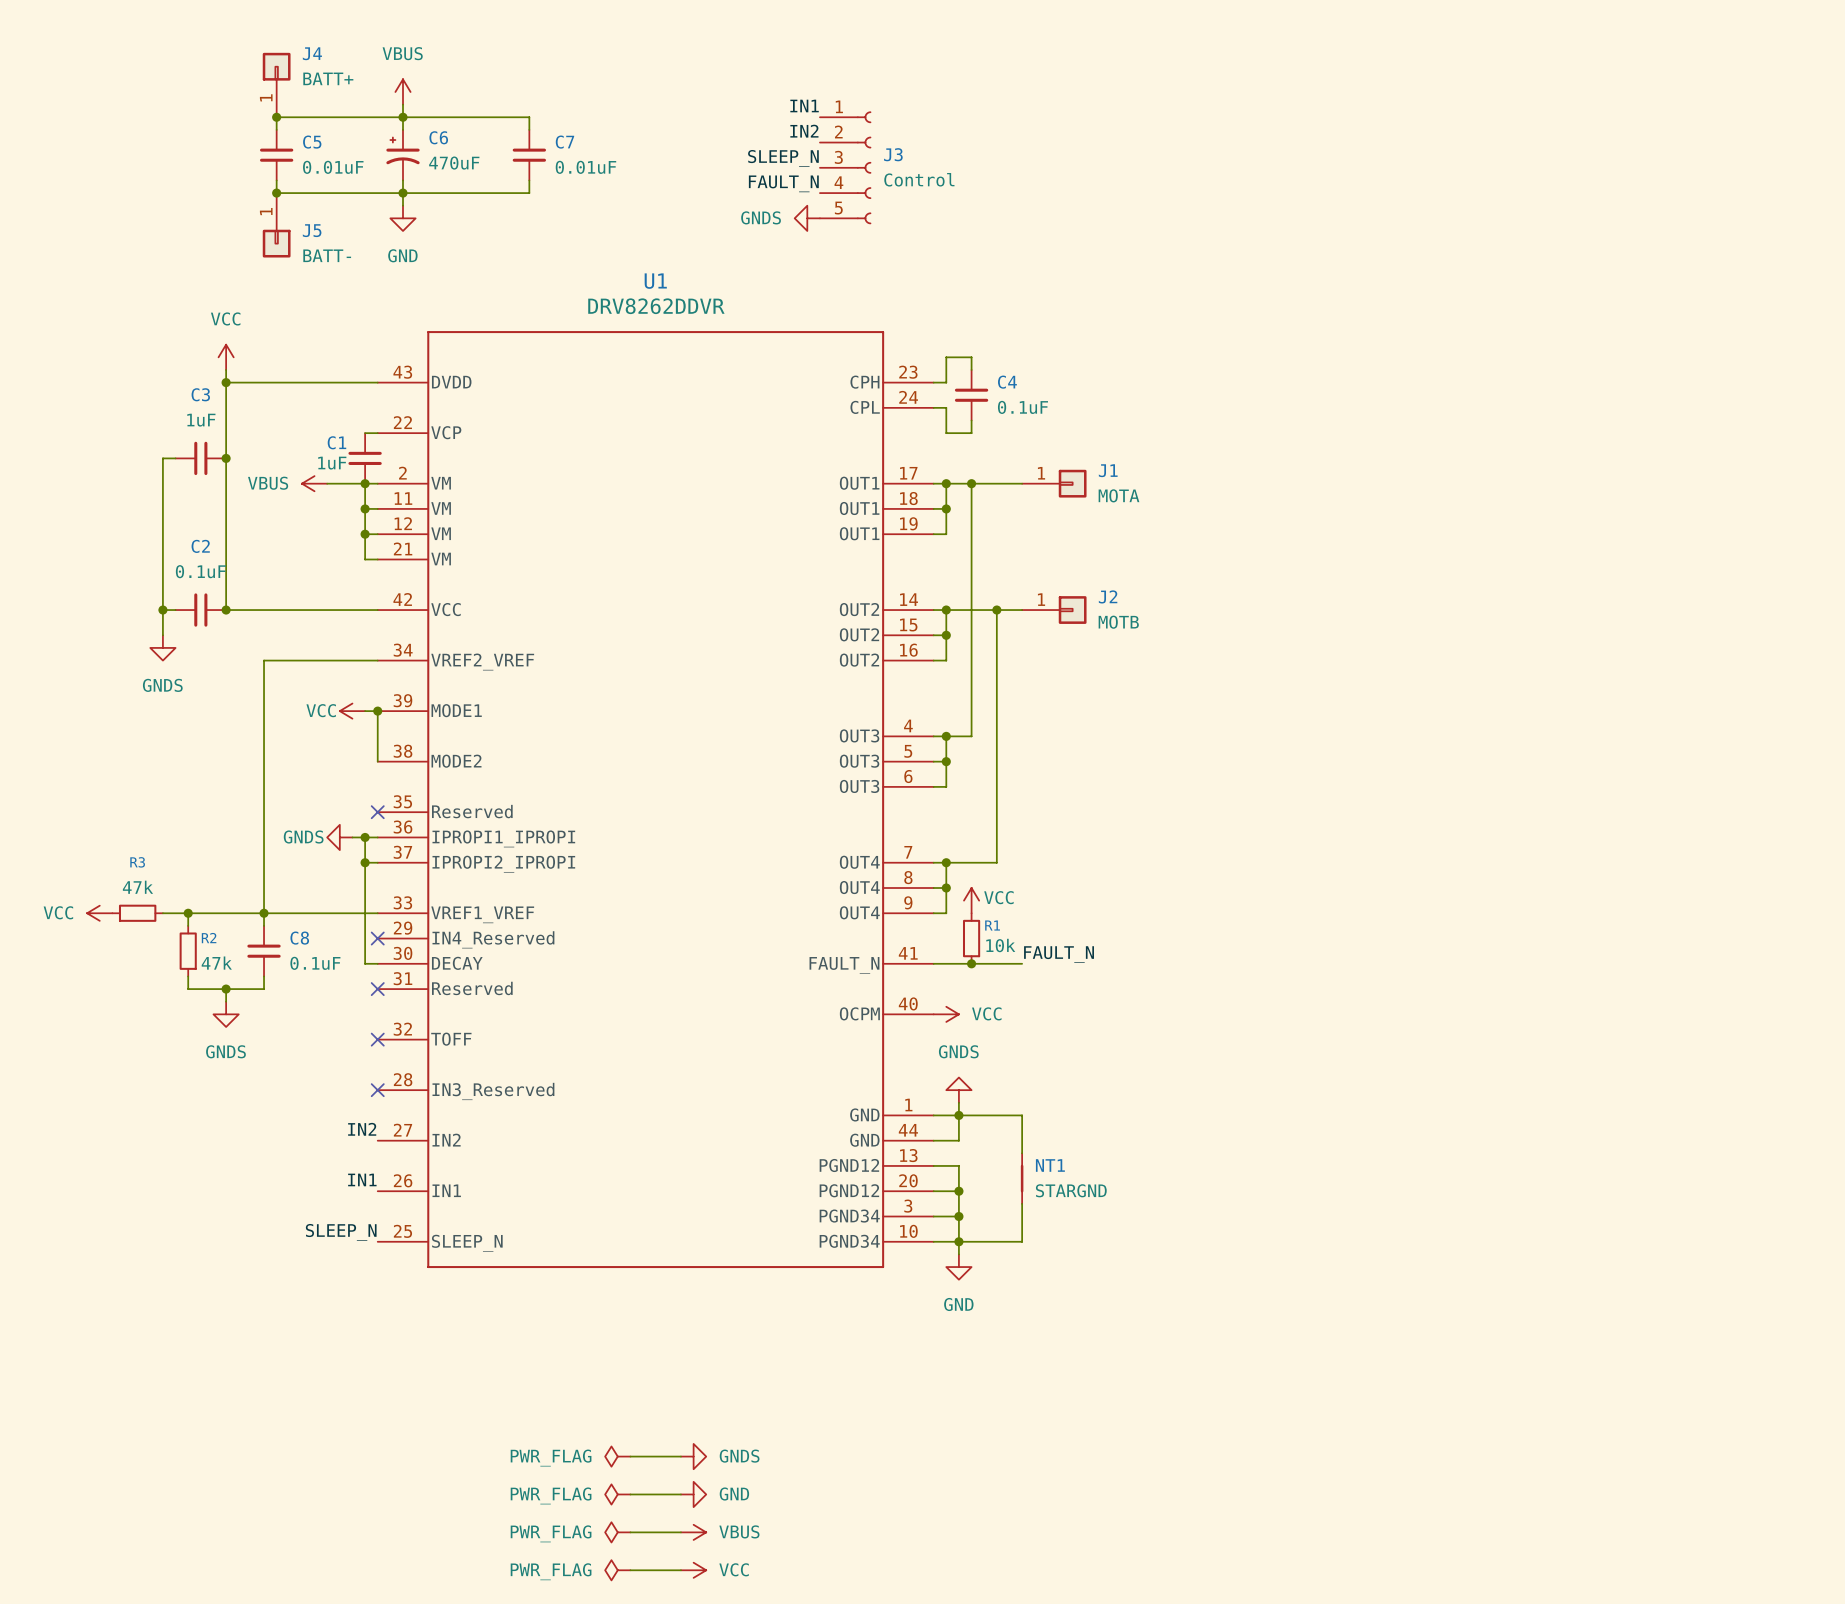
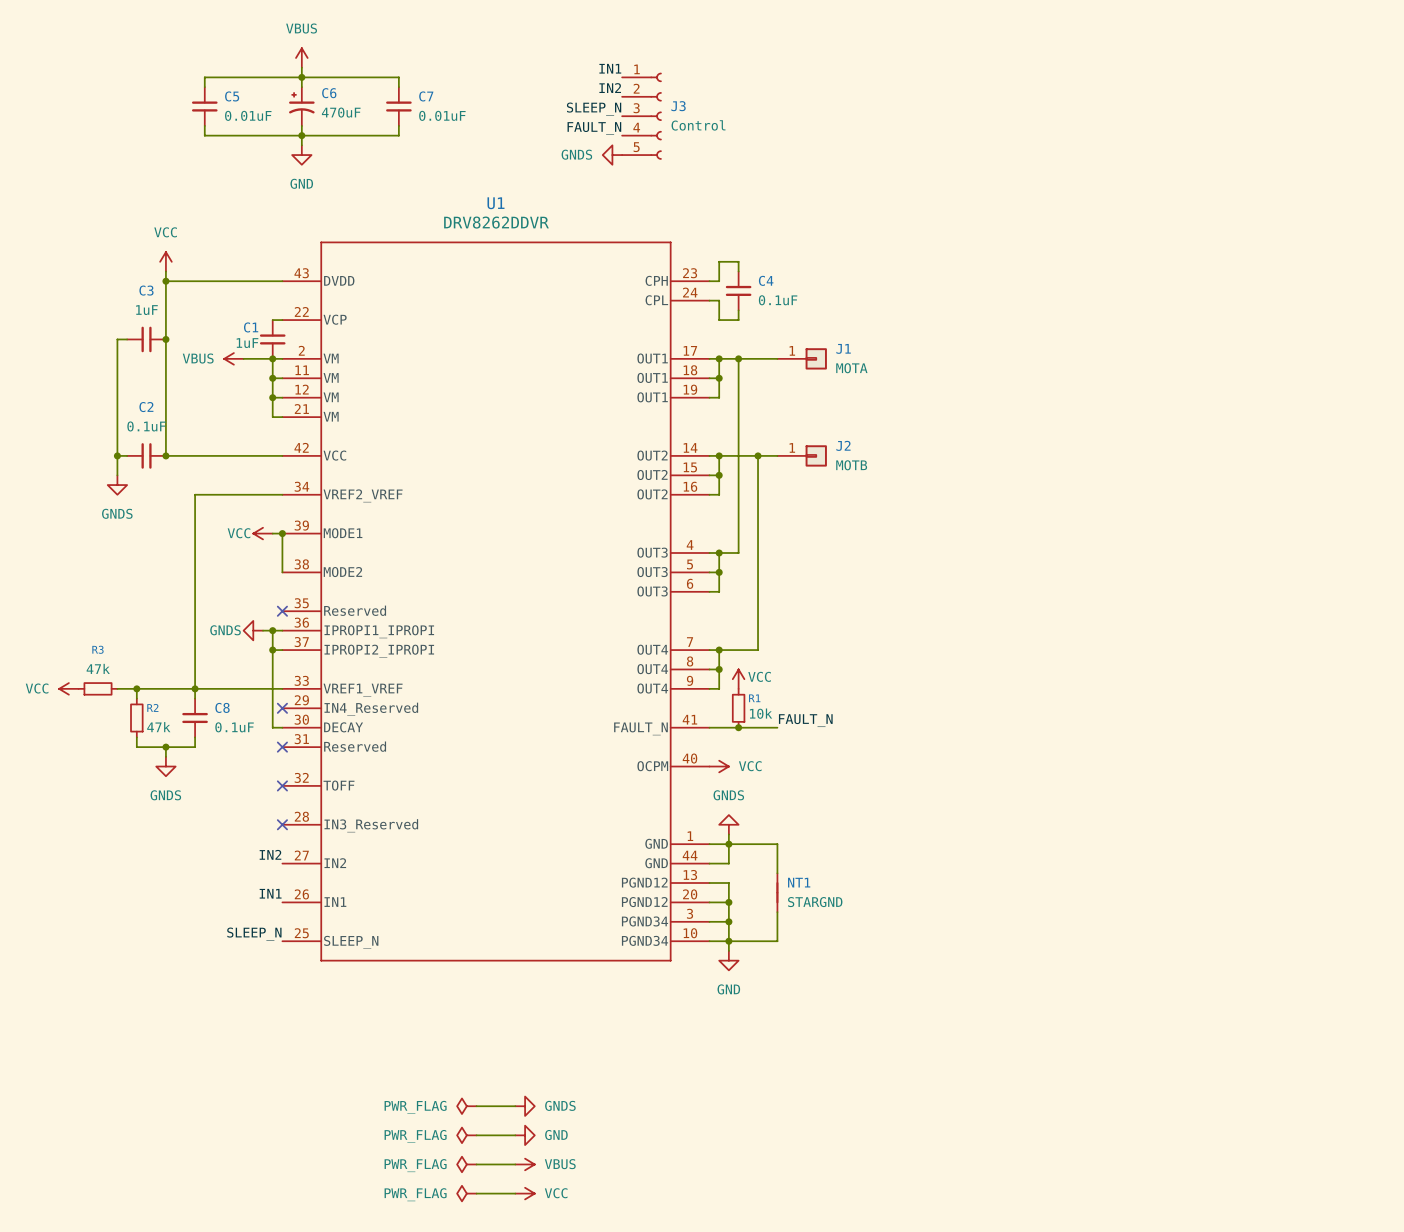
J4: BATT+ (276, 85) -> none
junction: (276, 117) -> none
junction: (276, 193) -> none
J5: BATT- (276, 225) -> none

